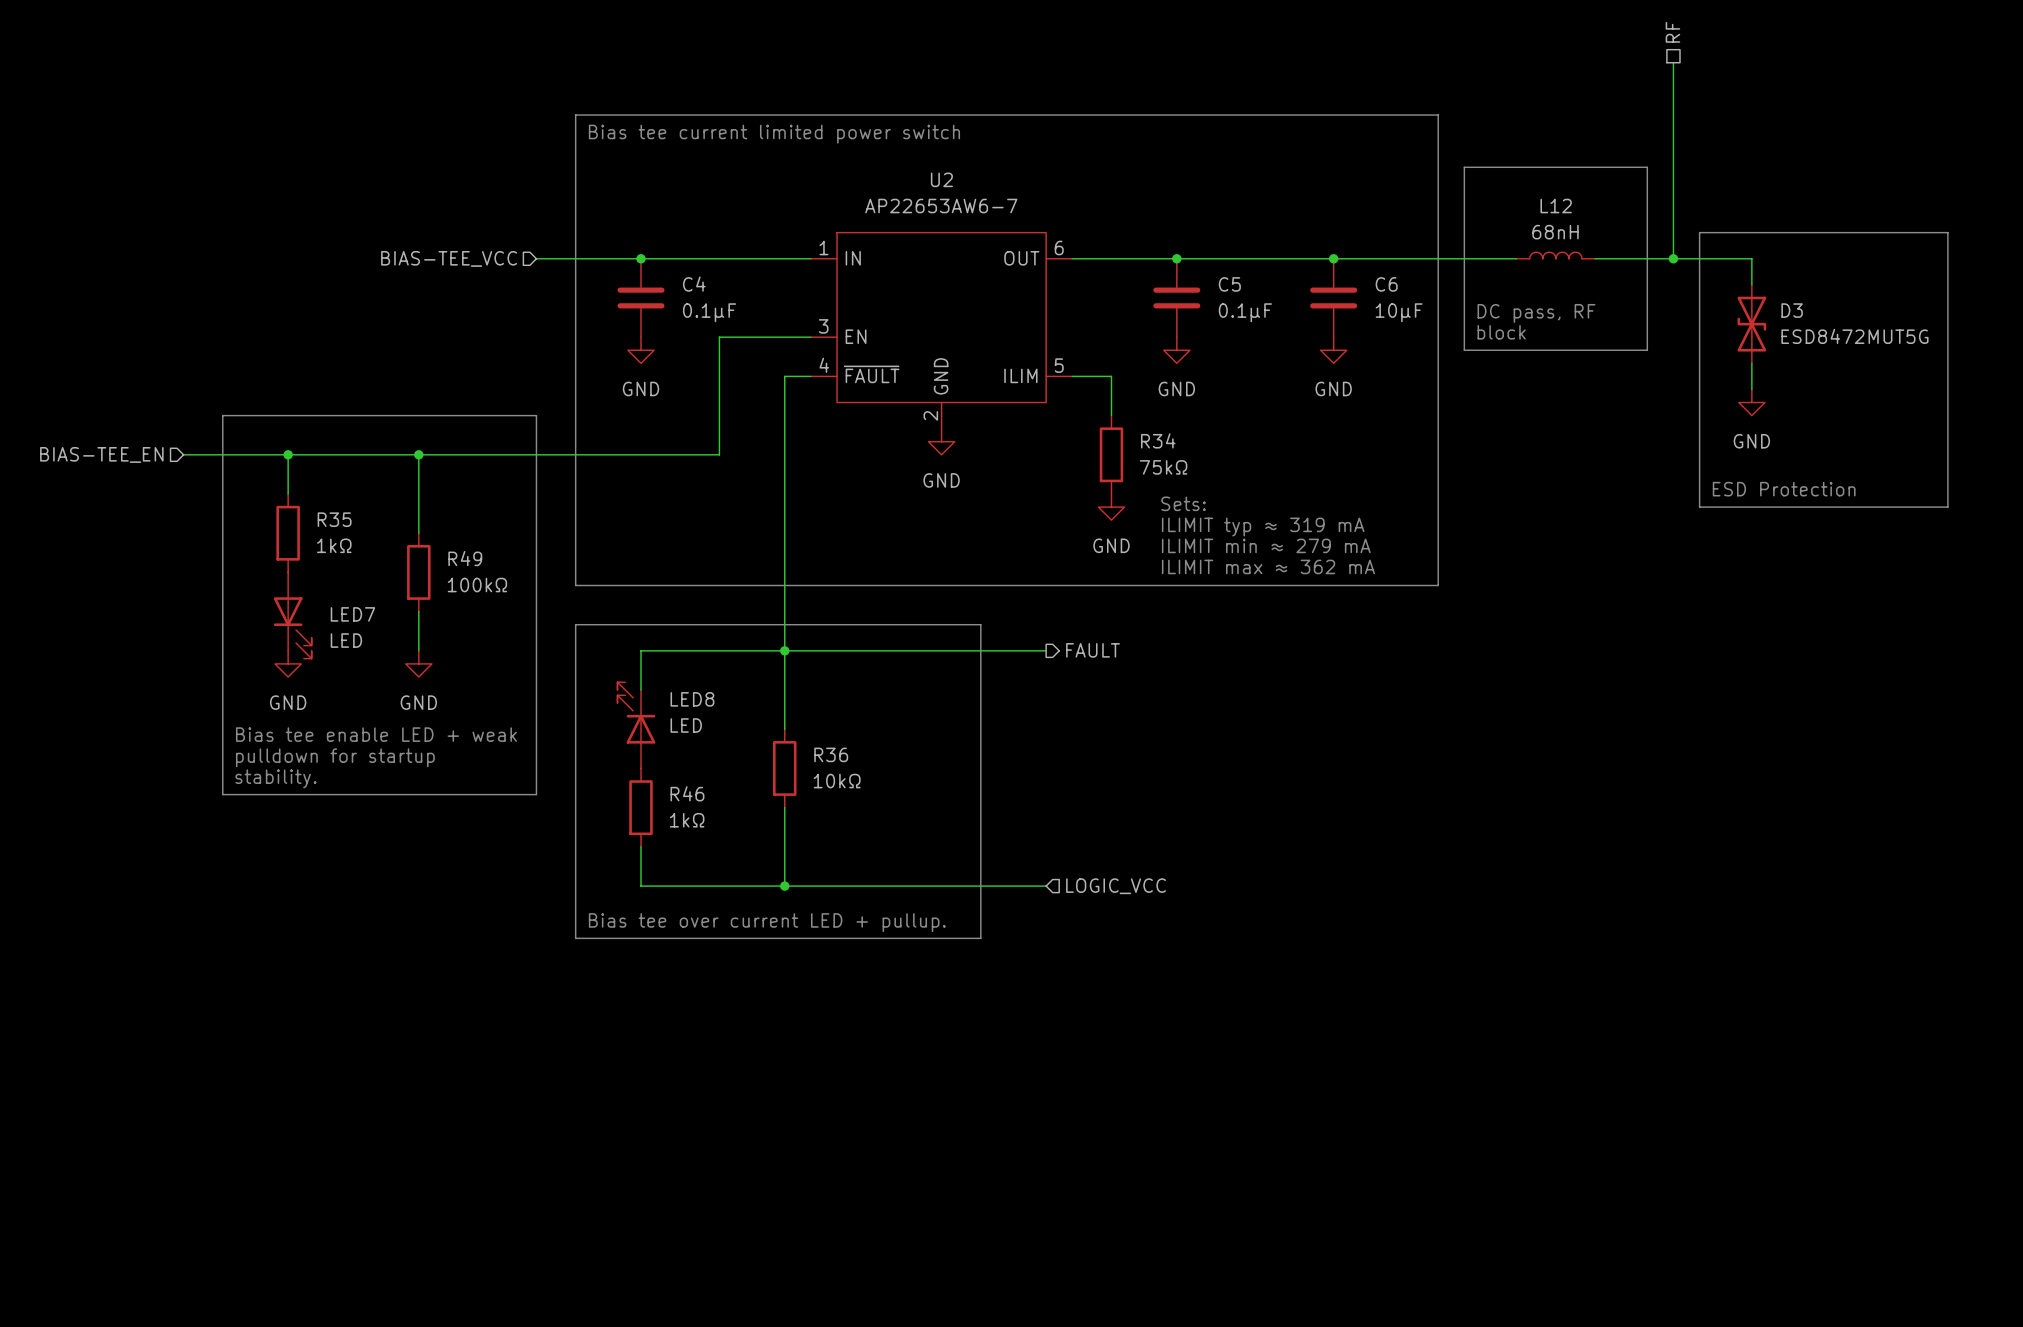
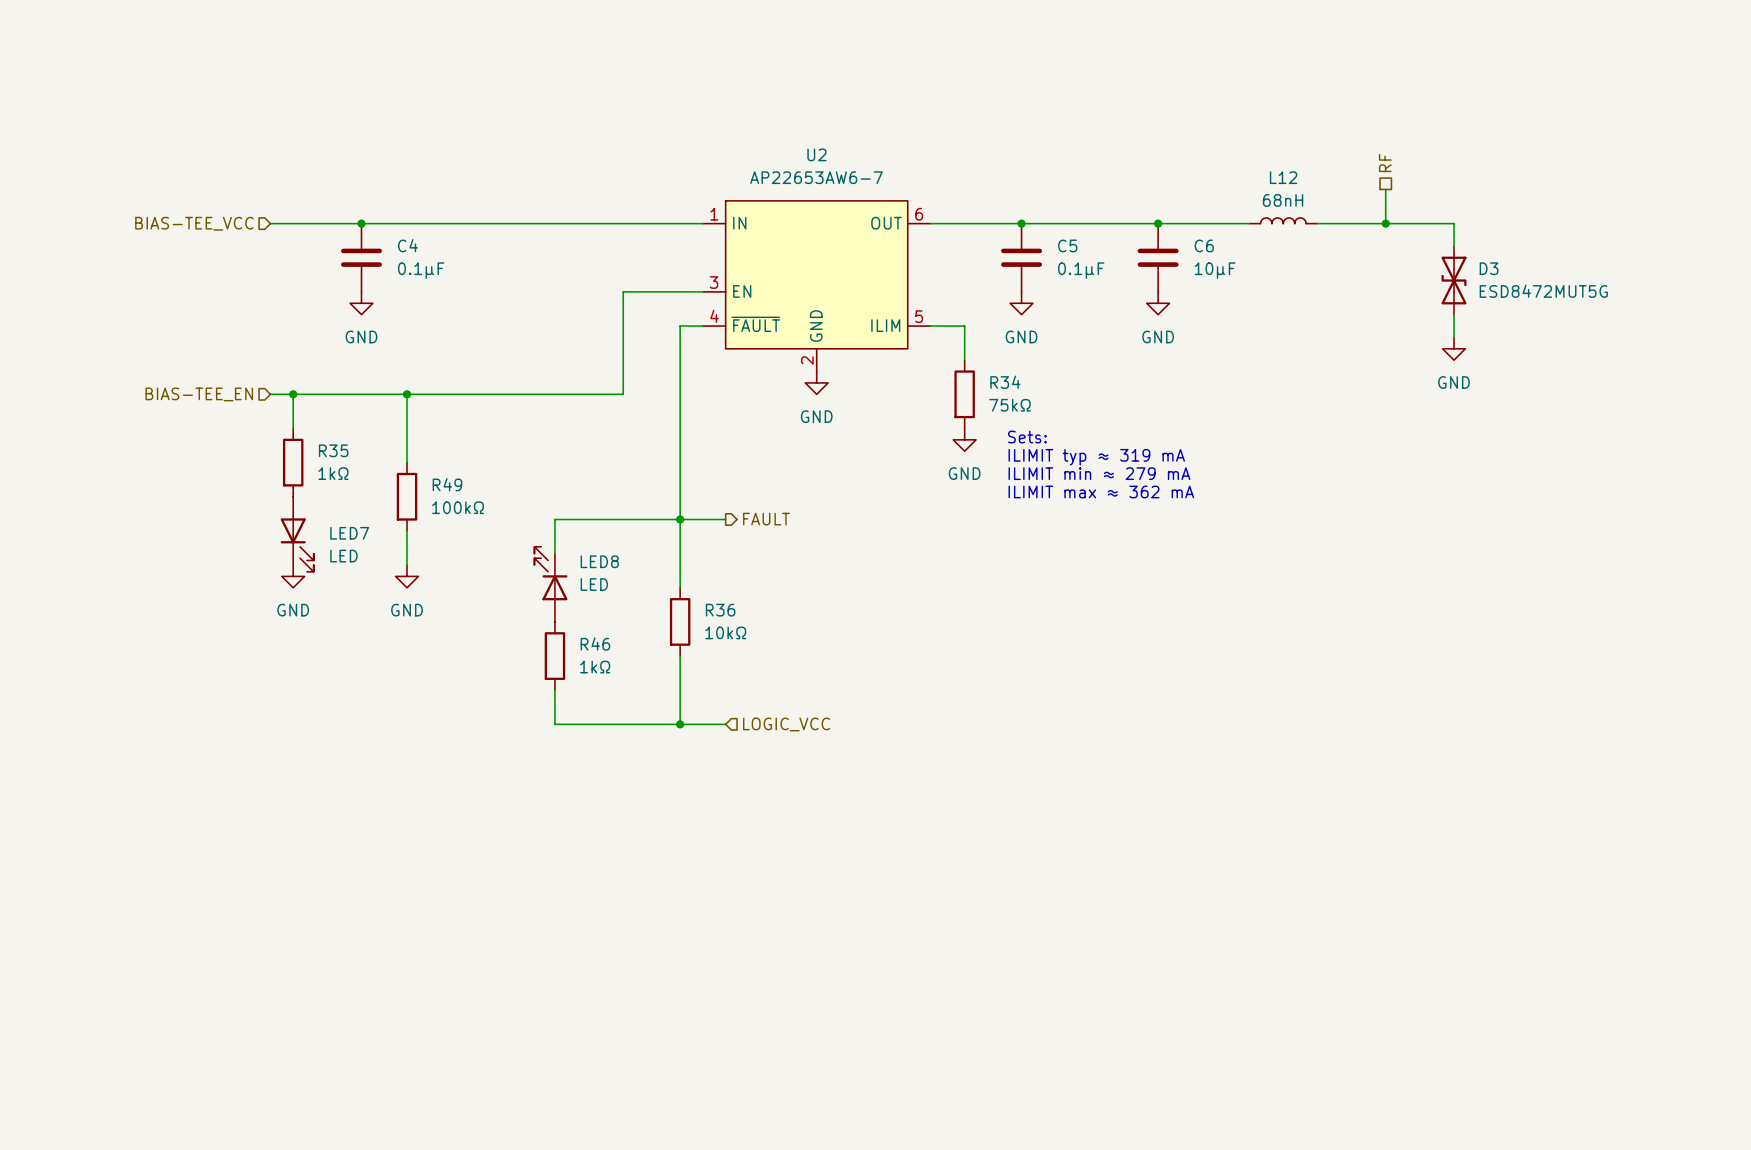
hierarchical label position: RF (1672, 32) -> RF (1385, 163)
wire: (1673, 62) (1673, 258) (1751, 258) (1751, 284) -> none
line: (575, 115) (1438, 115) (1438, 585) (575, 585) (575, 115) -> none
text: Bias tee current limited power switch (774, 134) -> none
line: (1464, 167) (1647, 167) (1647, 350) (1464, 350) (1464, 167) -> none
line: (1699, 232) (1947, 232) (1947, 507) (1699, 507) (1699, 232) -> none
L12 position: (1555, 255) -> (1283, 220)
wire: none -> (270, 223) (463, 223)
junction: none -> (361, 223)
hierarchical label position: BIAS-TEE_VCC (449, 258) -> BIAS-TEE_VCC (194, 223)
junction: (641, 258) -> none
wire: (1438, 258) (1516, 258) -> (1385, 189) (1385, 223) (1317, 223)
junction: none -> (1385, 223)
wire: none -> (1454, 223) (1454, 246)
junction: (1673, 258) -> none
C4 position: (641, 297) -> (361, 257)
text: DC pass, RF (1536, 313) -> none
D3 position: (1751, 324) -> (1454, 280)
text: block (1501, 332) -> none
power symbol: none -> GND (361, 303)
power symbol: GND (641, 350) -> none
wire: (1751, 363) (1751, 389) -> (1454, 314) (1454, 337)
power symbol position: GND (1751, 402) -> GND (1454, 348)
line: (222, 415) (536, 415) (536, 794) (222, 794) (222, 415) -> none
hierarchical label position: BIAS-TEE_EN (101, 454) -> BIAS-TEE_EN (199, 394)
wire: (183, 454) (314, 454) -> none
wire: (288, 454) (288, 494) -> (293, 394) (293, 428)
junction: (288, 454) -> none
junction: none -> (293, 394)
wire: (418, 454) (418, 533) -> (407, 394) (407, 462)
junction: (418, 454) -> none
junction: none -> (407, 394)
text: ESD Protection (1784, 489) -> none
R35 position: (288, 533) -> (293, 462)
R49 position: (418, 572) -> (407, 496)
wire: none -> (725, 519) (554, 519) (554, 553)
wire: (418, 611) (418, 650) -> (407, 530) (407, 565)
LED7 position: (292, 615) -> (297, 534)
line: (575, 624) (575, 938) (980, 938) (980, 624) (575, 624) -> none
junction position: (784, 650) -> (680, 519)
wire: (1046, 650) (641, 650) (641, 690) -> none
hierarchical label position: FAULT (1093, 650) -> FAULT (766, 519)
power symbol: GND (288, 663) -> none
power symbol: none -> GND (293, 576)
power symbol: GND (418, 663) -> none
power symbol: none -> GND (407, 576)
wire: (784, 676) (784, 729) -> none
LED8 position: (636, 725) -> (550, 584)
text: Bias tee enable LED + weak (376, 734) -> none
text: pulldown for startup (335, 757) -> none
R36 position: (784, 768) -> (680, 621)
text: stability. (275, 778) -> none
wire: none -> (554, 690) (554, 724) (725, 724)
R46 position: (641, 807) -> (554, 656)
wire: (784, 833) (784, 886) -> (680, 656) (680, 701)
wire: (641, 846) (641, 886) (1046, 886) -> none
junction position: (784, 886) -> (680, 724)
hierarchical label position: LOGIC_VCC (1116, 886) -> LOGIC_VCC (786, 724)
text: Bias tee over current LED + pullup. (767, 922) -> none

